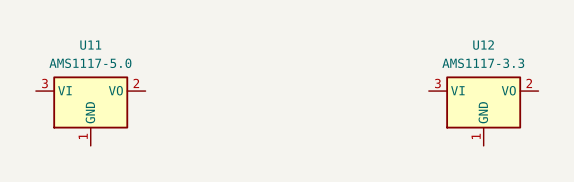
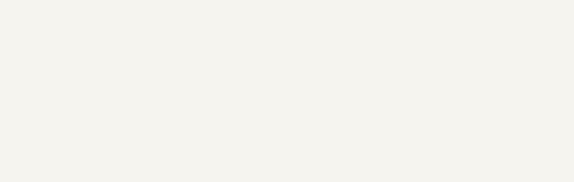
U11: AMS1117-5.0 (90, 111) -> none
U12: AMS1117-3.3 (483, 111) -> none

